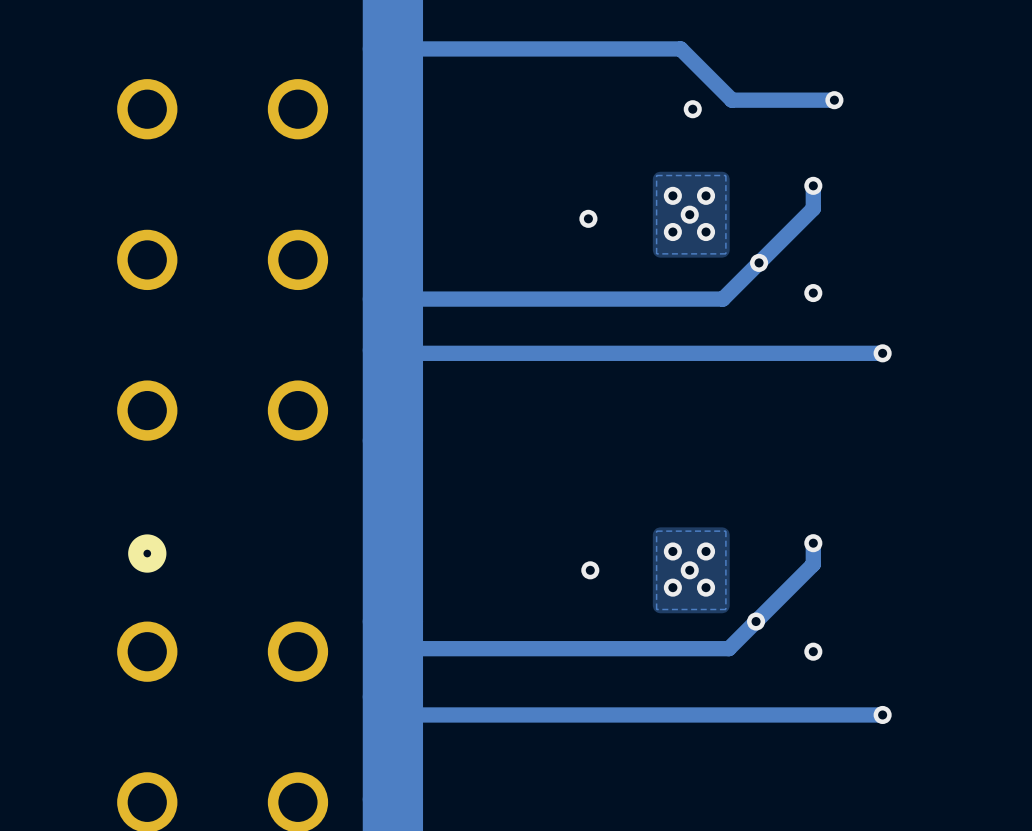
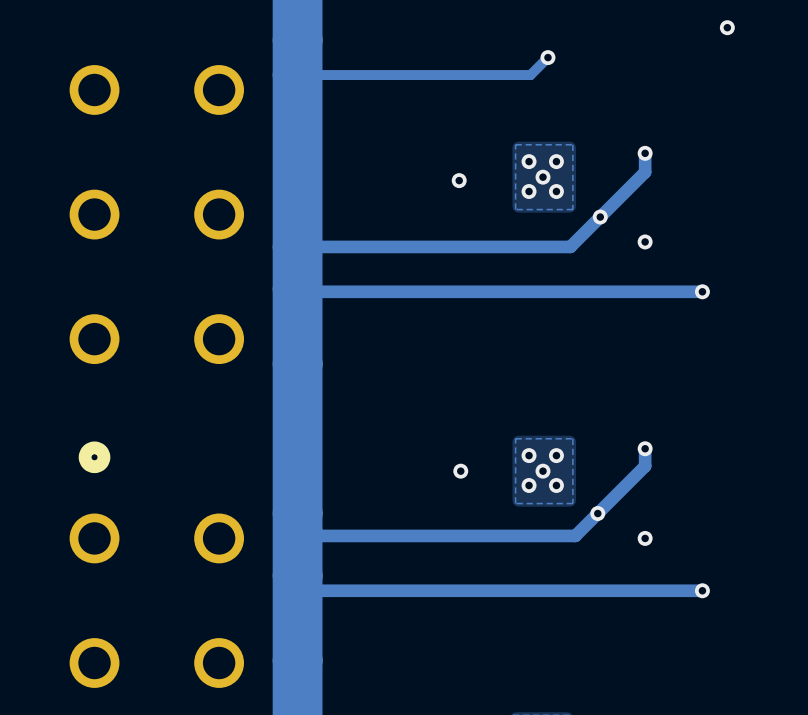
via: none -> (727, 27)
track: (392, 48) (680, 48) (731, 100) (834, 100) -> none
track: none -> (547, 57) (530, 75) (297, 75)
via: (834, 100) -> none
via position: (692, 109) -> (547, 57)

